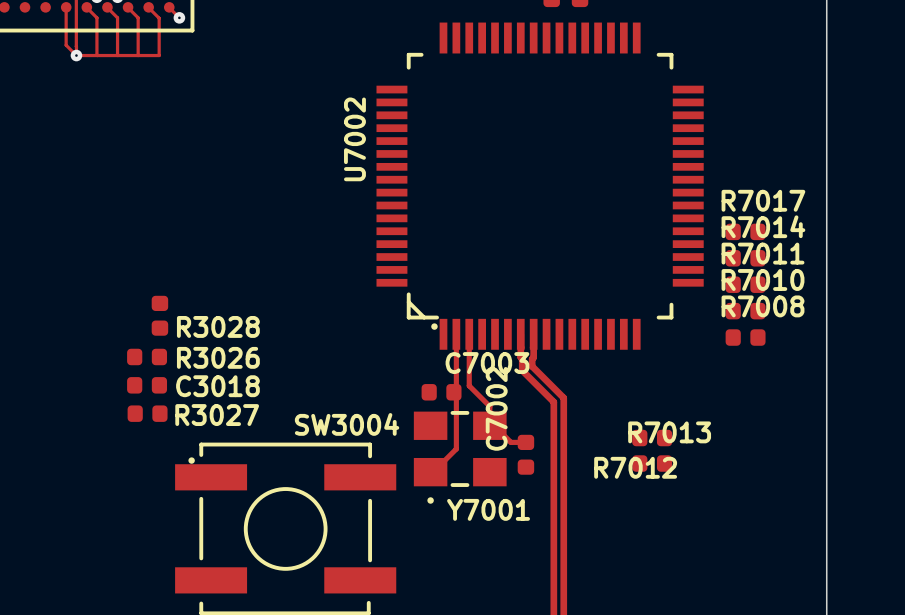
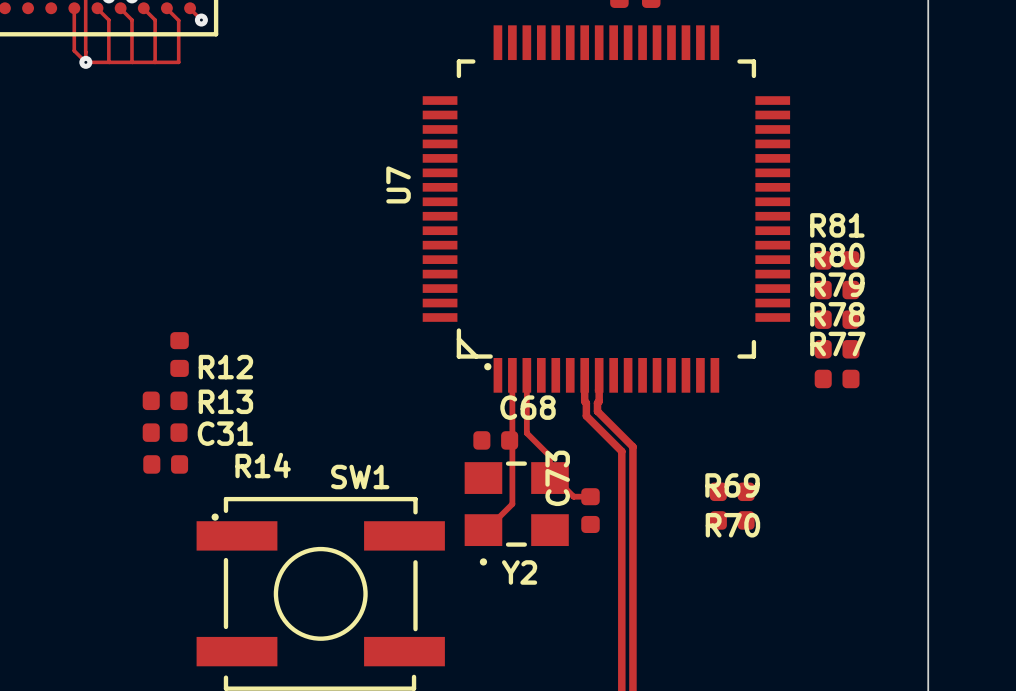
U7002 name: U7002 (354, 139) -> U7 (398, 184)
R7017 name: R7017 (763, 200) -> R81 (837, 225)
R7014 name: R7014 (763, 226) -> R80 (837, 255)
R7011 name: R7011 (763, 253) -> R79 (837, 284)
R7010 name: R7010 (763, 279) -> R78 (837, 314)
R7008 name: R7008 (763, 306) -> R77 (837, 344)
R3028 name: R3028 (218, 326) -> R12 (225, 367)
R3026 name: R3026 (218, 357) -> R13 (225, 401)
C7003 name: C7003 (487, 363) -> C68 (528, 407)
C3018 name: C3018 (217, 386) -> C31 (225, 433)
C7002 name: C7002 (496, 408) -> C73 (557, 478)
R3027 name: R3027 (217, 415) -> R14 (263, 465)
SW3004 name: SW3004 (347, 424) -> SW1 (360, 477)
R7013 name: R7013 (669, 432) -> R69 (732, 485)
R7012 name: R7012 (635, 467) -> R70 (732, 525)
Y7001 name: Y7001 (488, 509) -> Y2 (519, 572)

